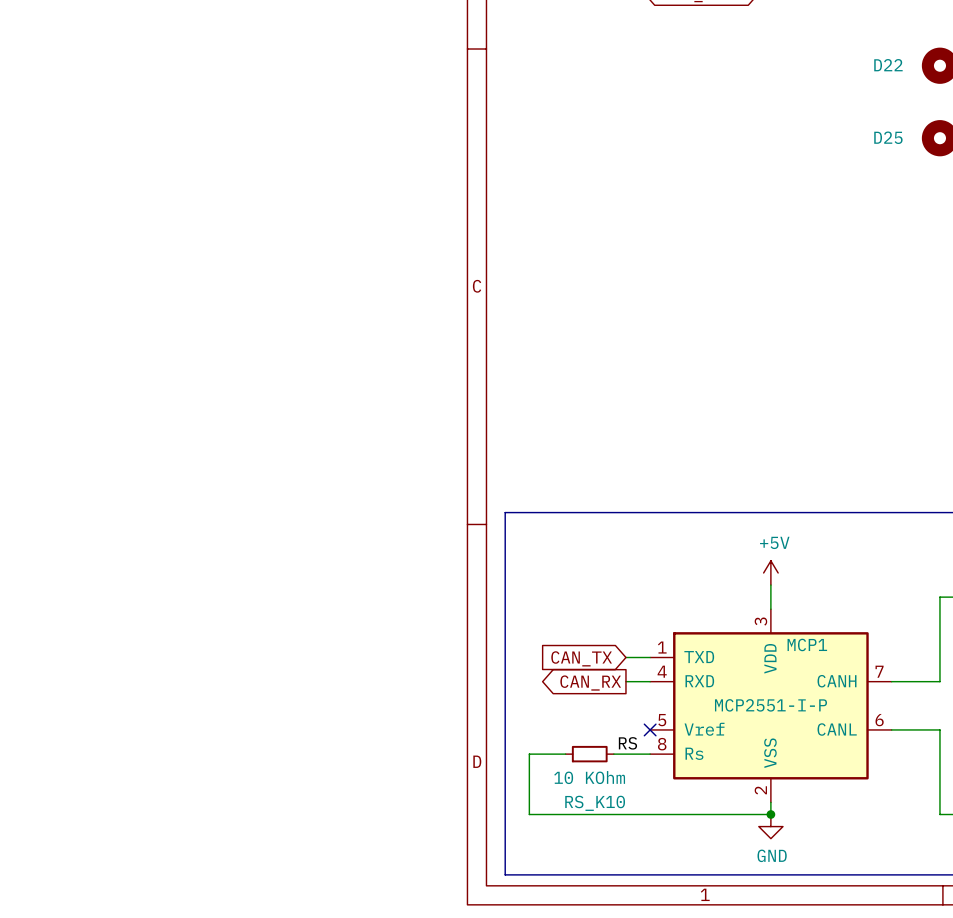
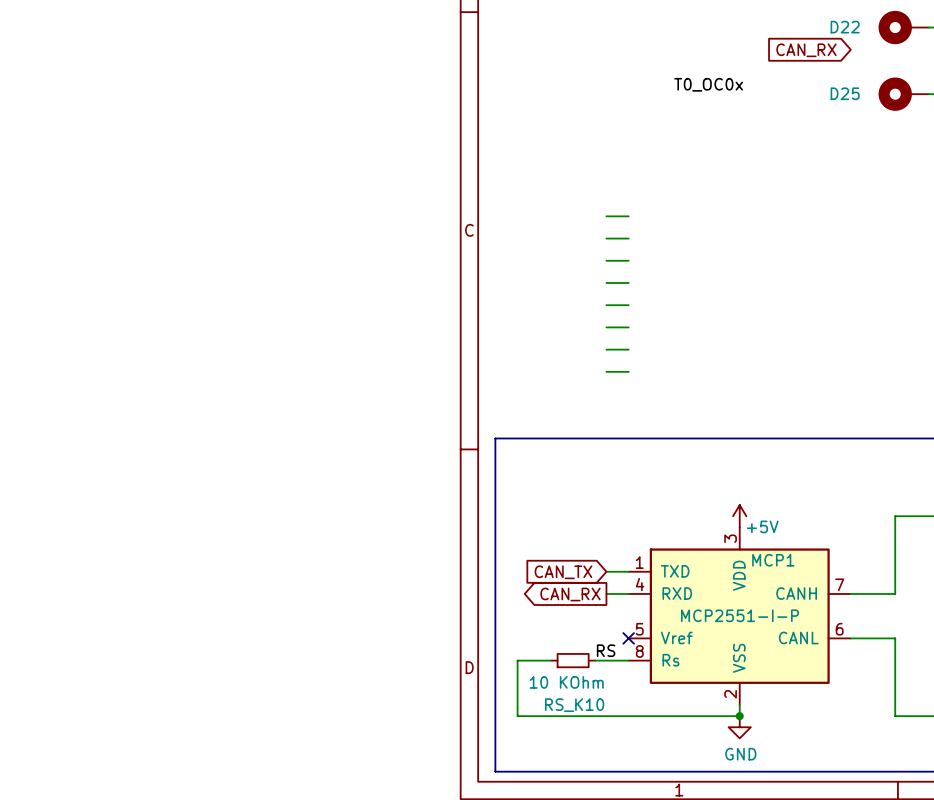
global label: none -> CAN_RX (806, 50)
label: none -> T0_OC0x (708, 84)
wire: none -> (606, 216) (628, 216)
wire: none -> (606, 238) (628, 238)
wire: none -> (606, 260) (628, 260)
wire: none -> (606, 282) (628, 282)
wire: none -> (606, 305) (628, 305)
wire: none -> (606, 327) (628, 327)
wire: none -> (606, 349) (628, 349)
wire: none -> (606, 371) (628, 371)
power symbol text position: +5V (774, 542) -> +5V (762, 526)
power symbol position: +5V (770, 572) -> +5V (739, 516)

